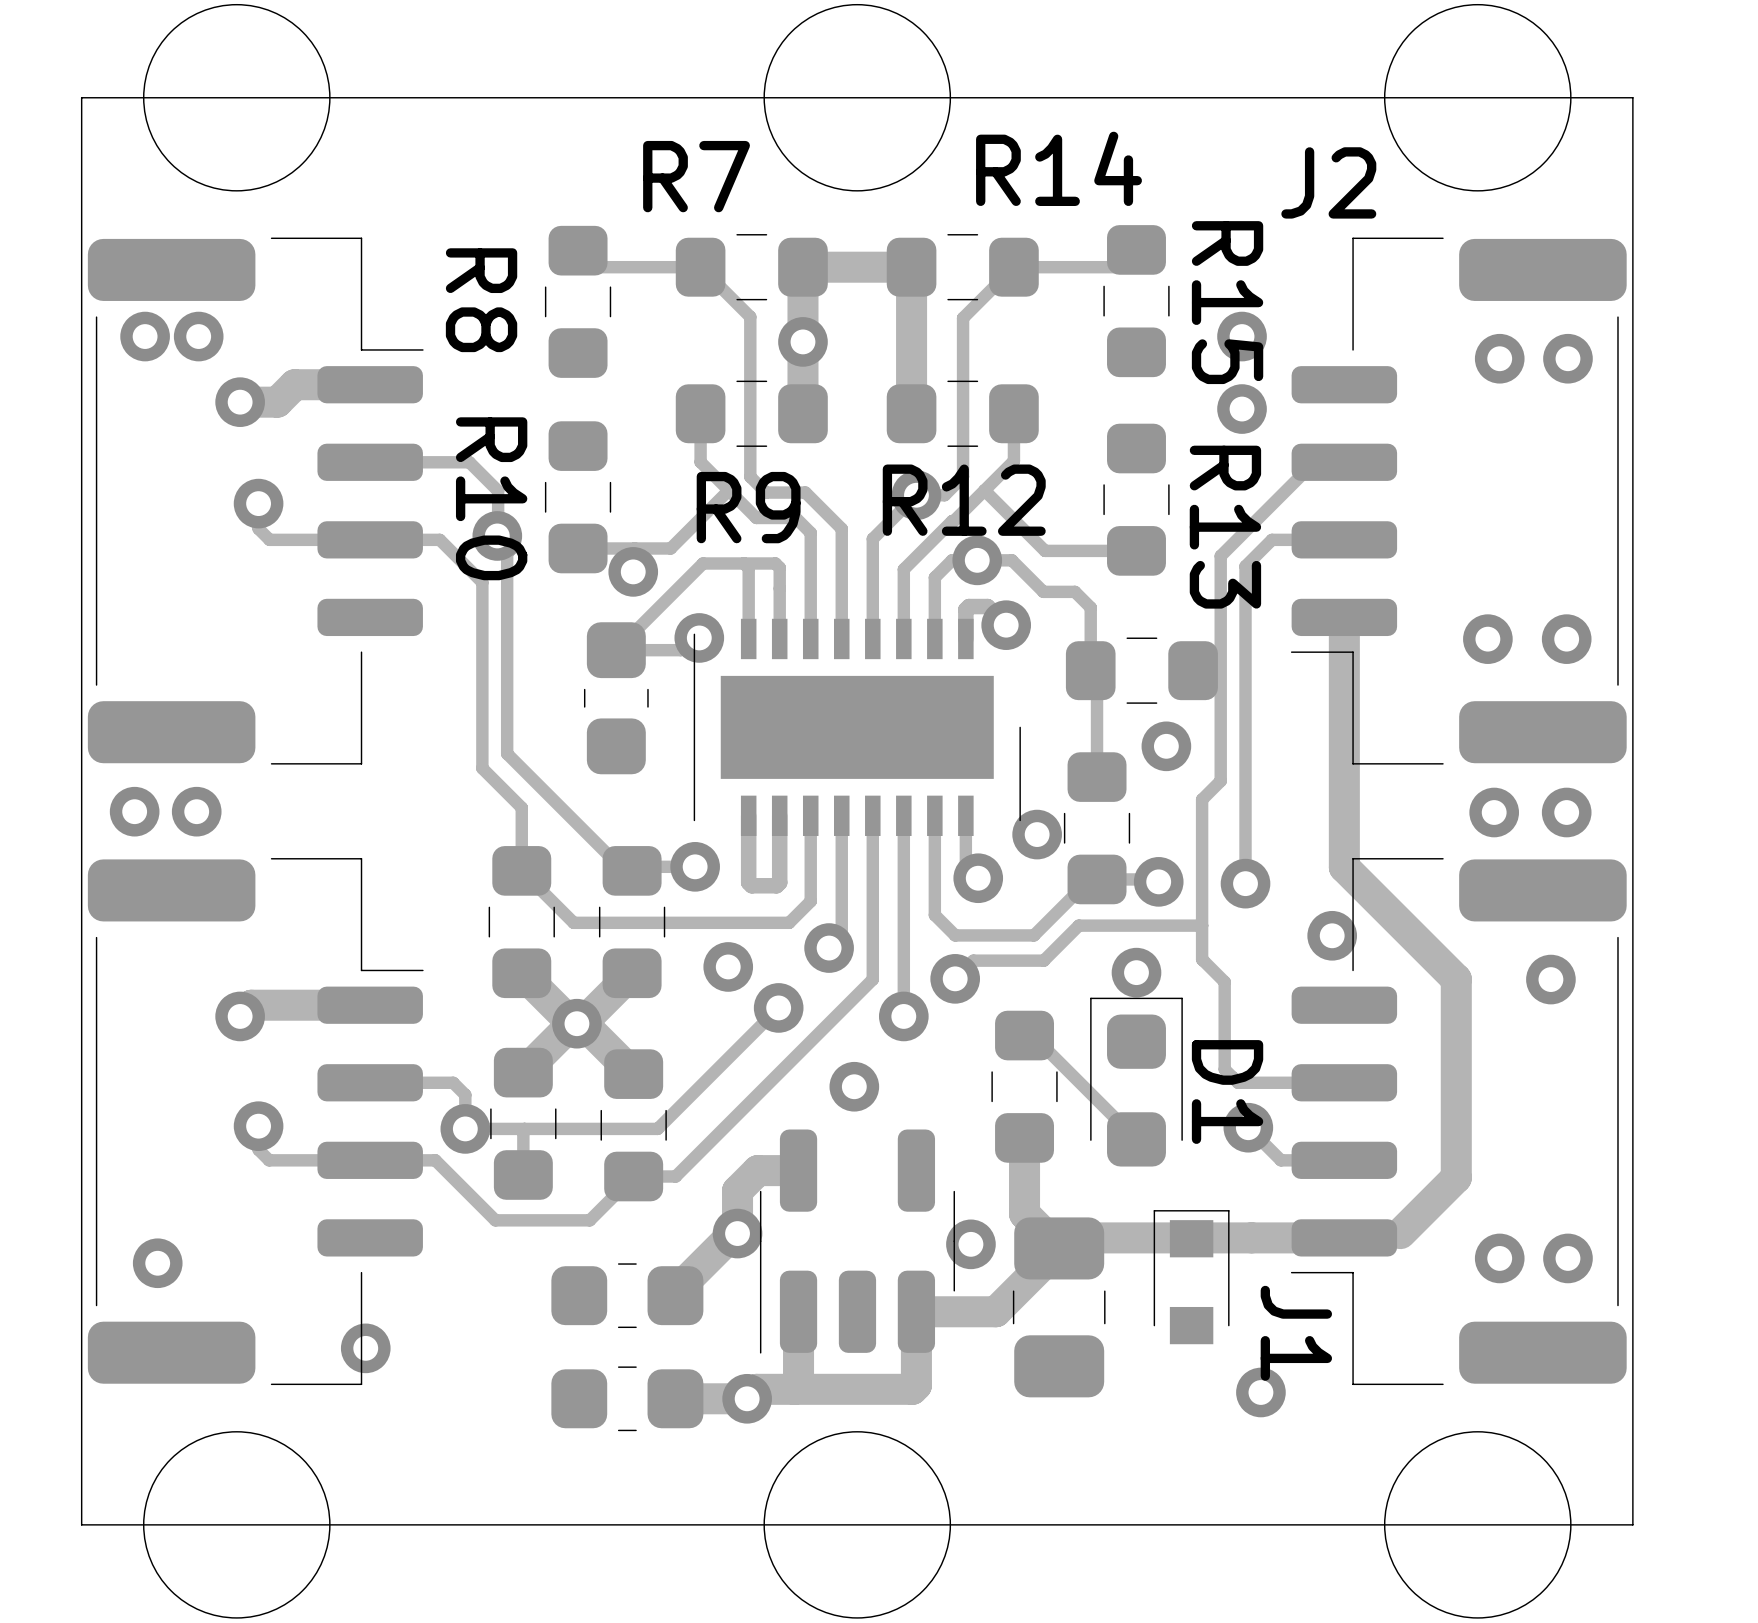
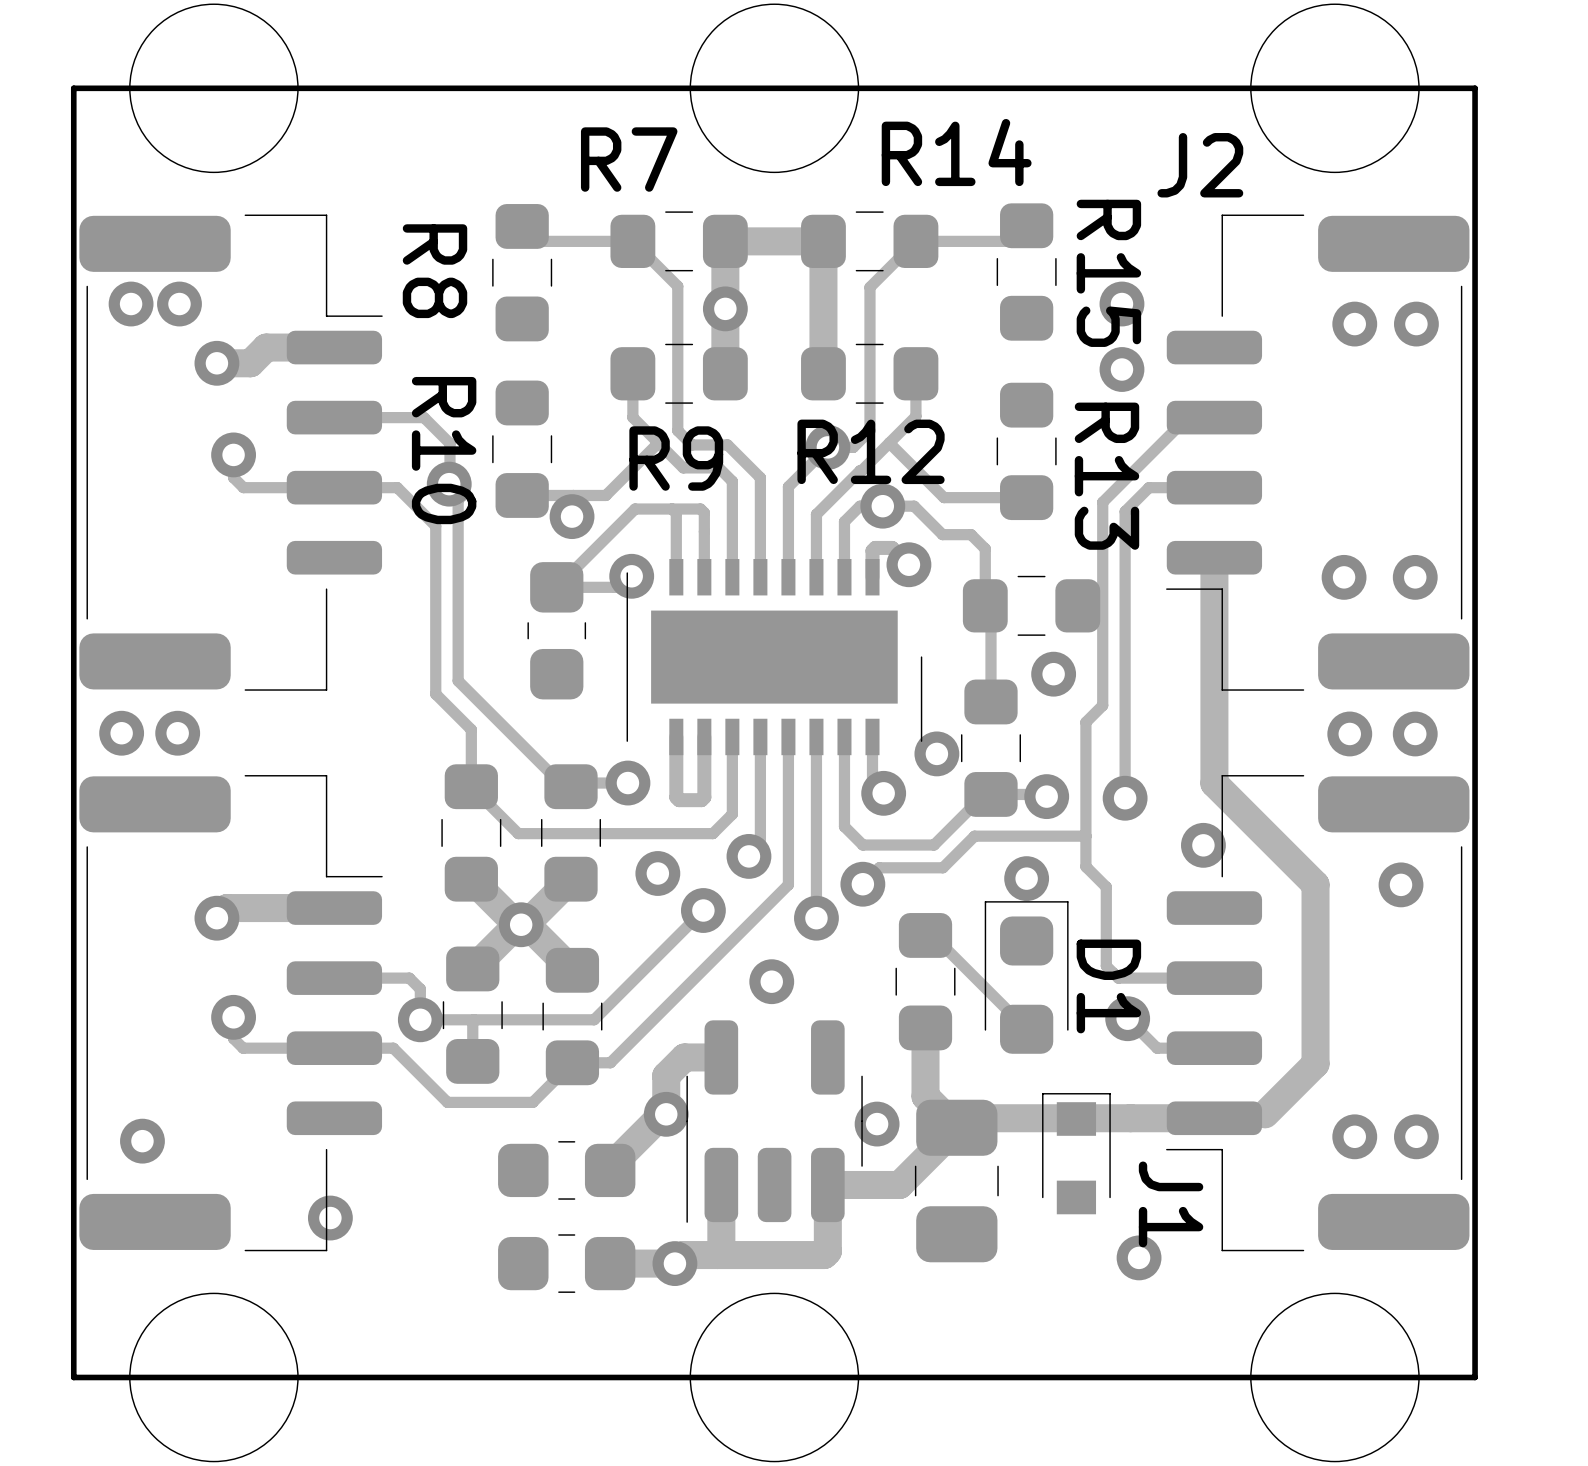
board edge width: thin (1632, 97) (81, 97) (81, 1524) (1632, 1524) (1632, 97) -> thick (1475, 88) (73, 88) (73, 1377) (1475, 1377) (1475, 88)

